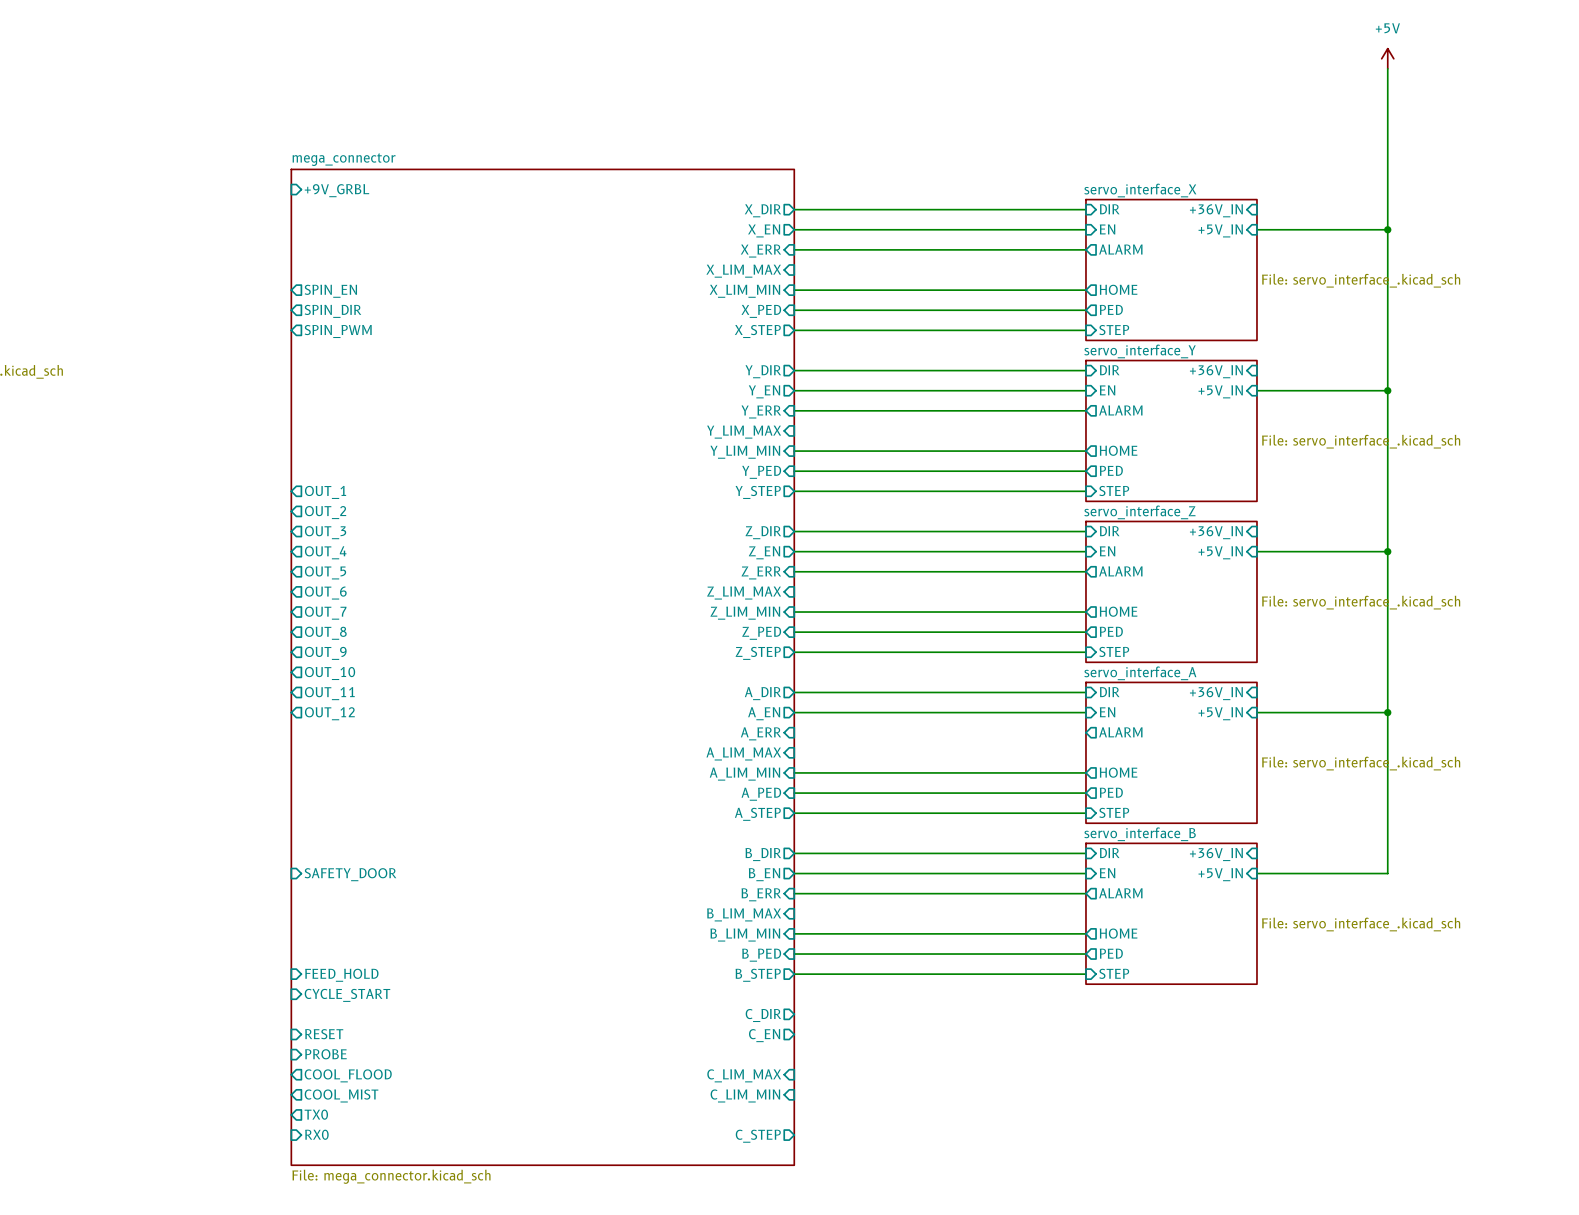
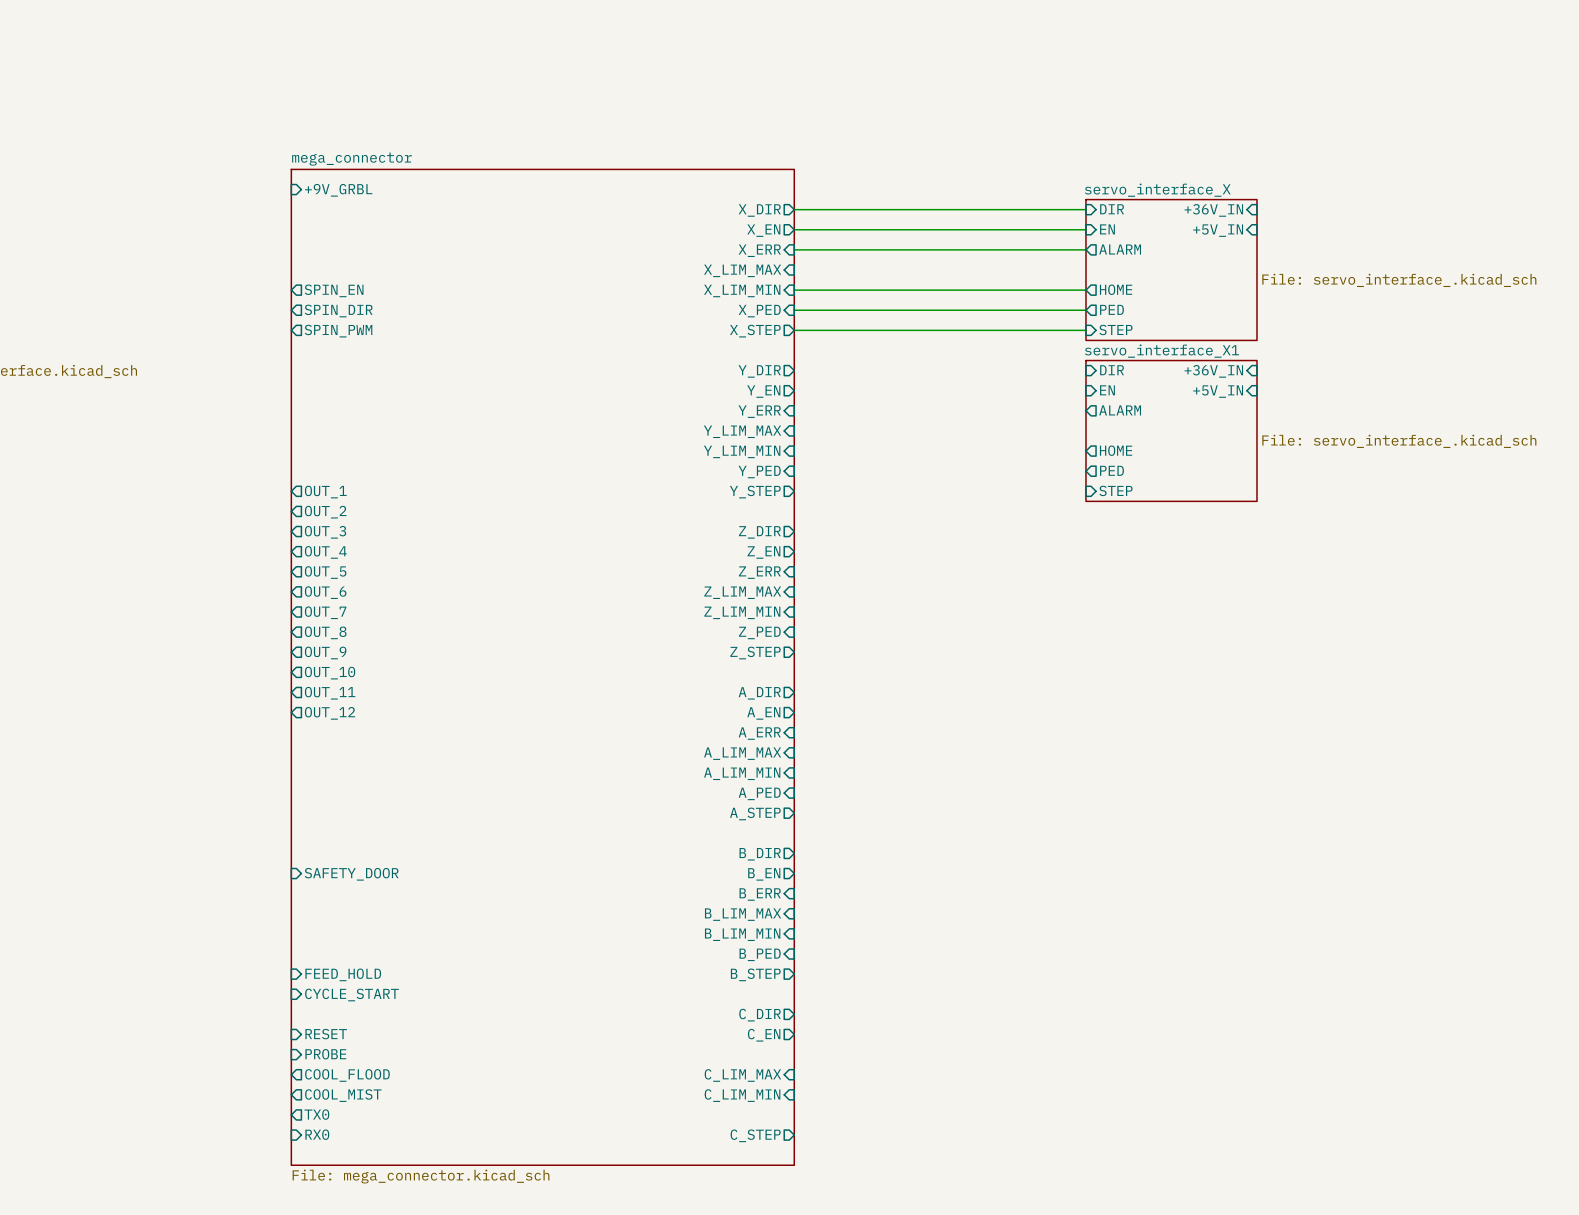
power symbol: +5V (1387, 58) -> none
wire: (1387, 68) (1387, 873) (1256, 873) -> none
wire: (1256, 229) (1387, 229) -> none
junction: (1387, 229) -> none
sheet servo_interface_Y name: servo_interface_Y (1140, 351) -> servo_interface_X1 (1161, 351)
wire: (794, 370) (1085, 370) -> none
wire: (794, 390) (1085, 390) -> none
wire: (1256, 390) (1387, 390) -> none
junction: (1387, 390) -> none
wire: (794, 410) (1085, 410) -> none
wire: (794, 451) (1085, 451) -> none
wire: (794, 471) (1085, 471) -> none
wire: (794, 491) (1085, 491) -> none
wire: (794, 531) (1085, 531) -> none
sheet pin: DIR (1109, 531) -> none
sheet pin: +36V_IN (1216, 532) -> none
wire: (794, 551) (1085, 551) -> none
sheet pin: EN (1107, 551) -> none
wire: (1256, 551) (1387, 551) -> none
junction: (1387, 551) -> none
sheet pin: +5V_IN (1220, 552) -> none
wire: (794, 571) (1085, 571) -> none
sheet pin: ALARM (1120, 571) -> none
sheet servo_interface_Z: File: servo_interface_.kicad_sch (1171, 591) -> none
sheet pin: HOME (1118, 611) -> none
wire: (794, 612) (1085, 612) -> none
sheet pin: PED (1111, 631) -> none
wire: (794, 632) (1085, 632) -> none
sheet pin: STEP (1114, 651) -> none
wire: (794, 652) (1085, 652) -> none
wire: (794, 692) (1085, 692) -> none
sheet pin: DIR (1109, 692) -> none
sheet pin: +36V_IN (1216, 693) -> none
wire: (794, 712) (1085, 712) -> none
sheet pin: EN (1107, 712) -> none
wire: (1256, 712) (1387, 712) -> none
junction: (1387, 712) -> none
sheet pin: +5V_IN (1220, 713) -> none
sheet pin: ALARM (1120, 732) -> none
sheet servo_interface_A: File: servo_interface_.kicad_sch (1171, 752) -> none
wire: (794, 772) (1085, 772) -> none
sheet pin: HOME (1118, 772) -> none
sheet pin: PED (1111, 792) -> none
wire: (794, 793) (1085, 793) -> none
sheet pin: STEP (1114, 812) -> none
wire: (794, 813) (1085, 813) -> none
wire: (794, 853) (1085, 853) -> none
sheet pin: DIR (1109, 853) -> none
sheet pin: +36V_IN (1216, 854) -> none
wire: (794, 873) (1085, 873) -> none
sheet pin: EN (1107, 873) -> none
sheet pin: +5V_IN (1220, 874) -> none
wire: (794, 893) (1085, 893) -> none
sheet pin: ALARM (1120, 893) -> none
sheet servo_interface_B: File: servo_interface_.kicad_sch (1171, 913) -> none
wire: (794, 933) (1085, 933) -> none
sheet pin: HOME (1118, 933) -> none
sheet pin: PED (1111, 953) -> none
wire: (794, 954) (1085, 954) -> none
sheet pin: STEP (1114, 973) -> none
wire: (794, 974) (1085, 974) -> none

